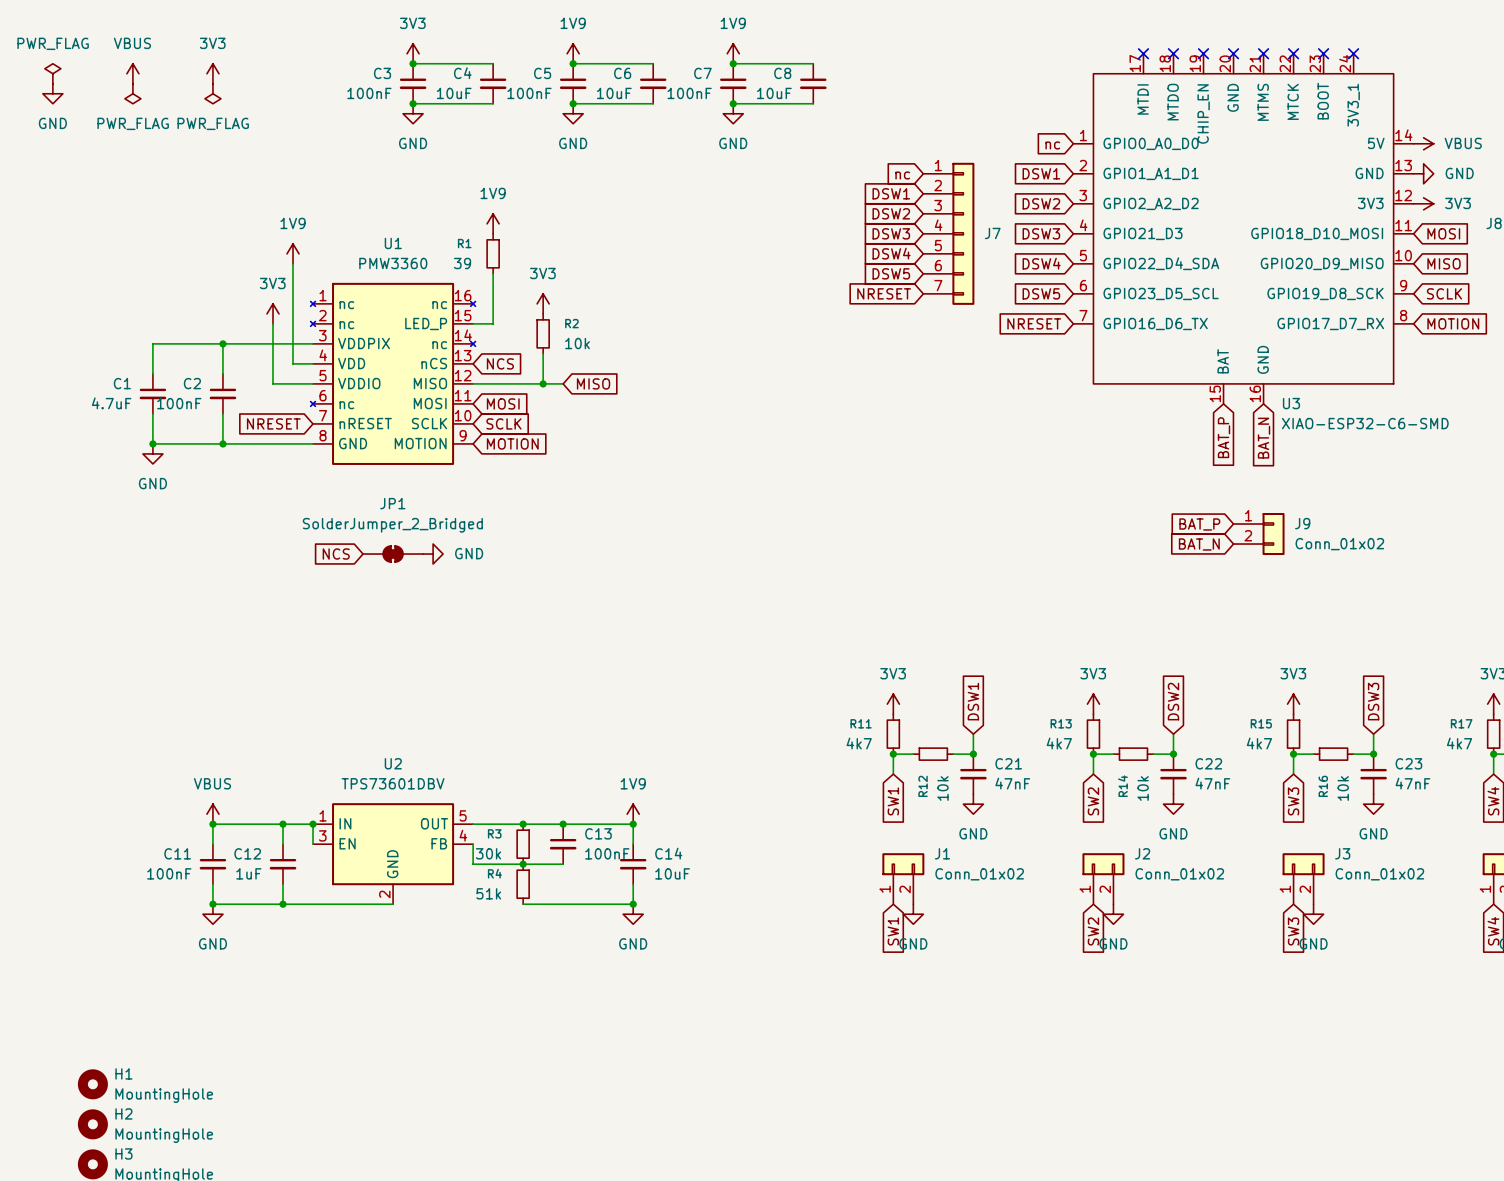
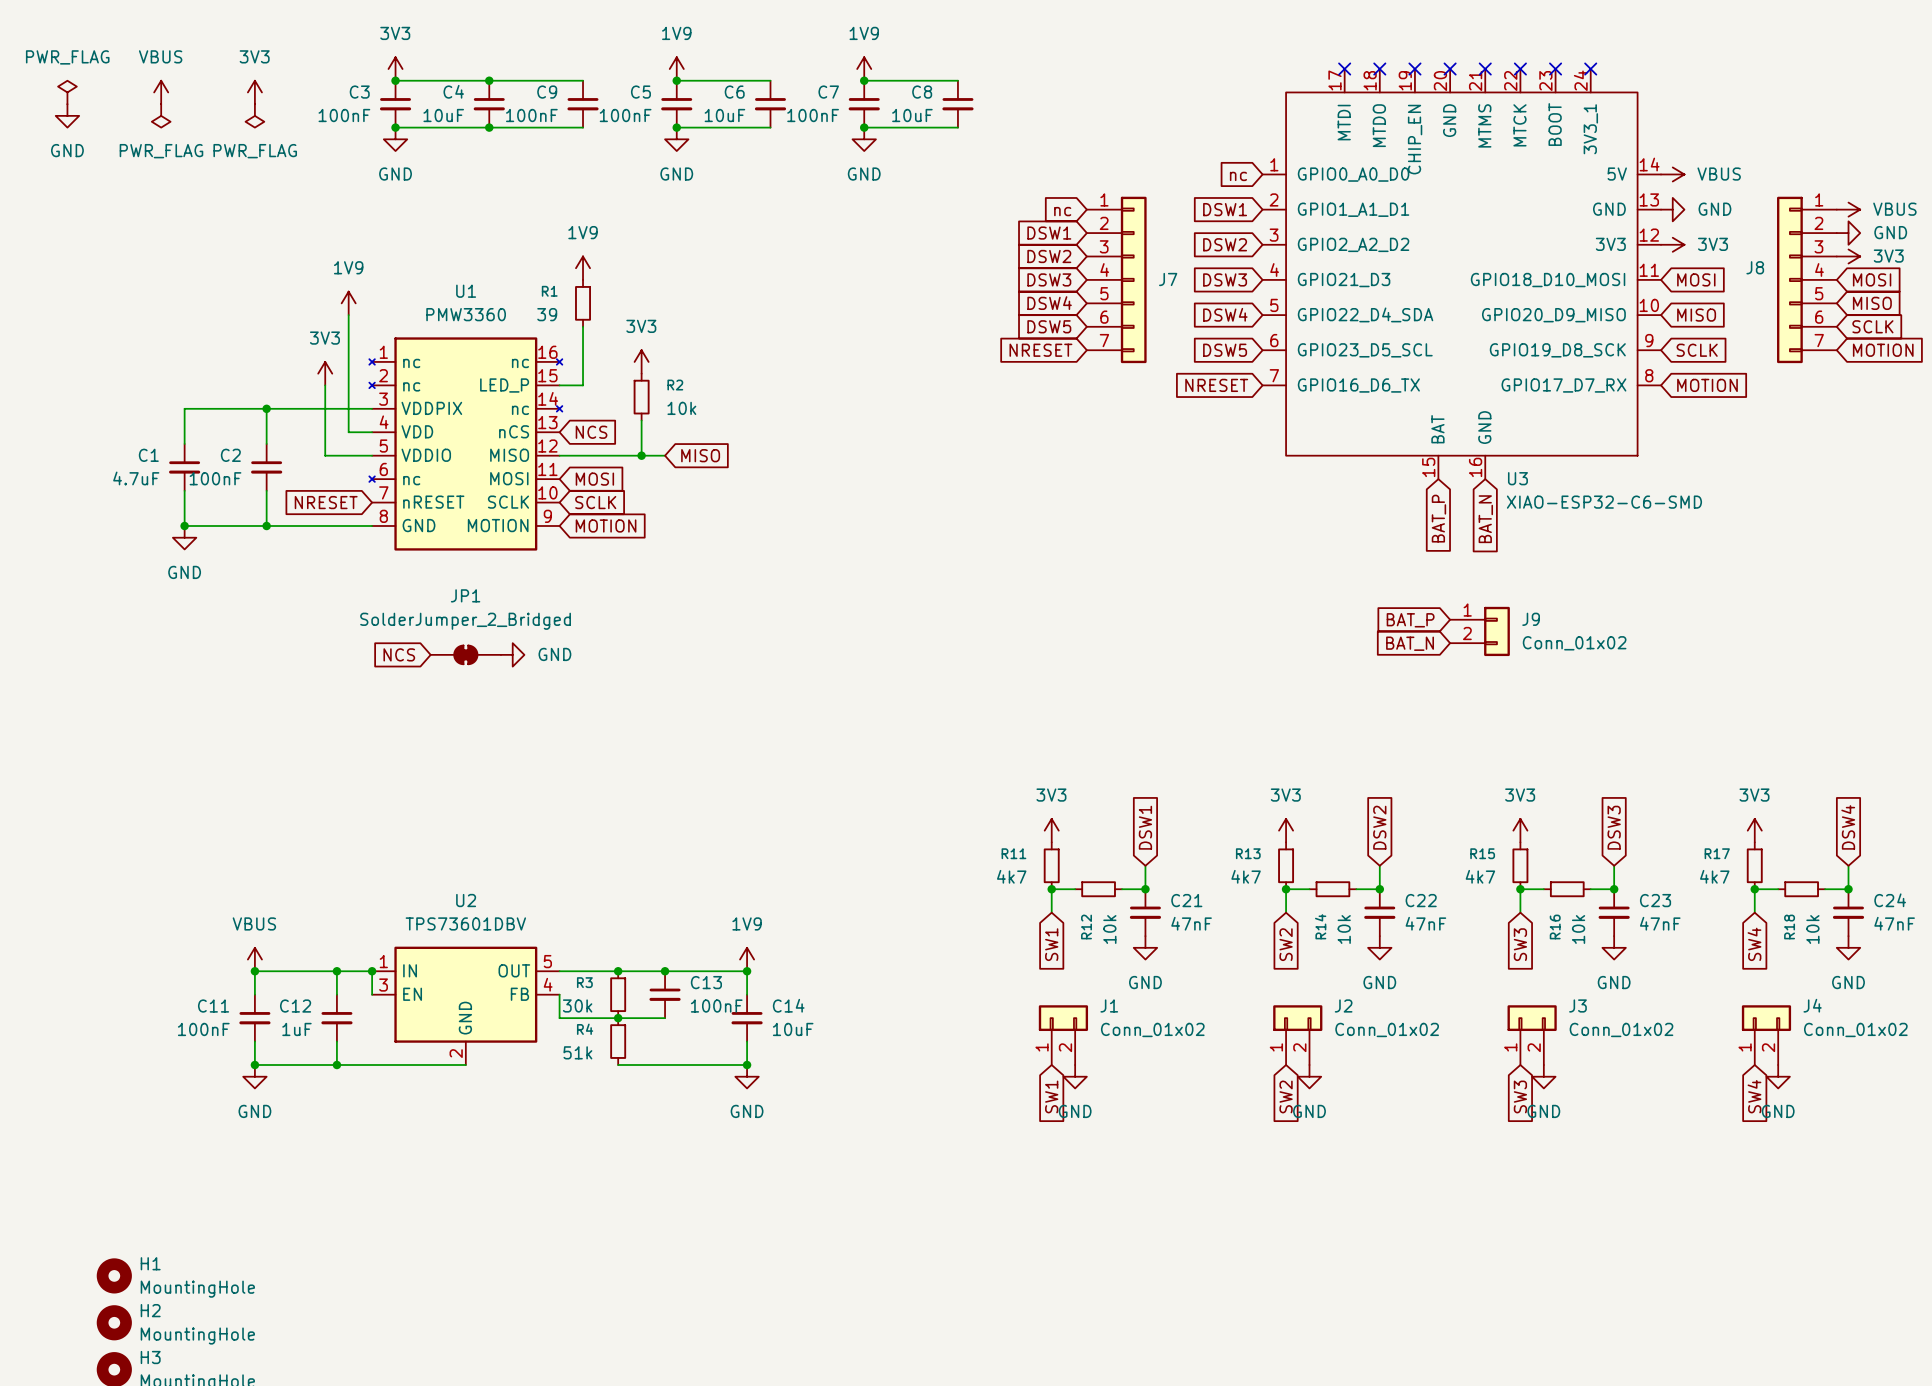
power symbol position: 3V3 (413, 53) -> 3V3 (395, 69)
wire: none -> (395, 80) (489, 80)
junction: none -> (395, 80)
C3 name: C3 (382, 73) -> C4 (453, 91)
C4 name: C4 (462, 73) -> C9 (547, 92)
C3: none -> 100nF (395, 104)
C3 value: 100nF (369, 93) -> 10uF (443, 115)
C4 value: 10uF (454, 93) -> 100nF (531, 115)
wire: none -> (395, 127) (489, 127)
junction: none -> (395, 127)
power symbol position: GND (413, 113) -> GND (395, 139)

